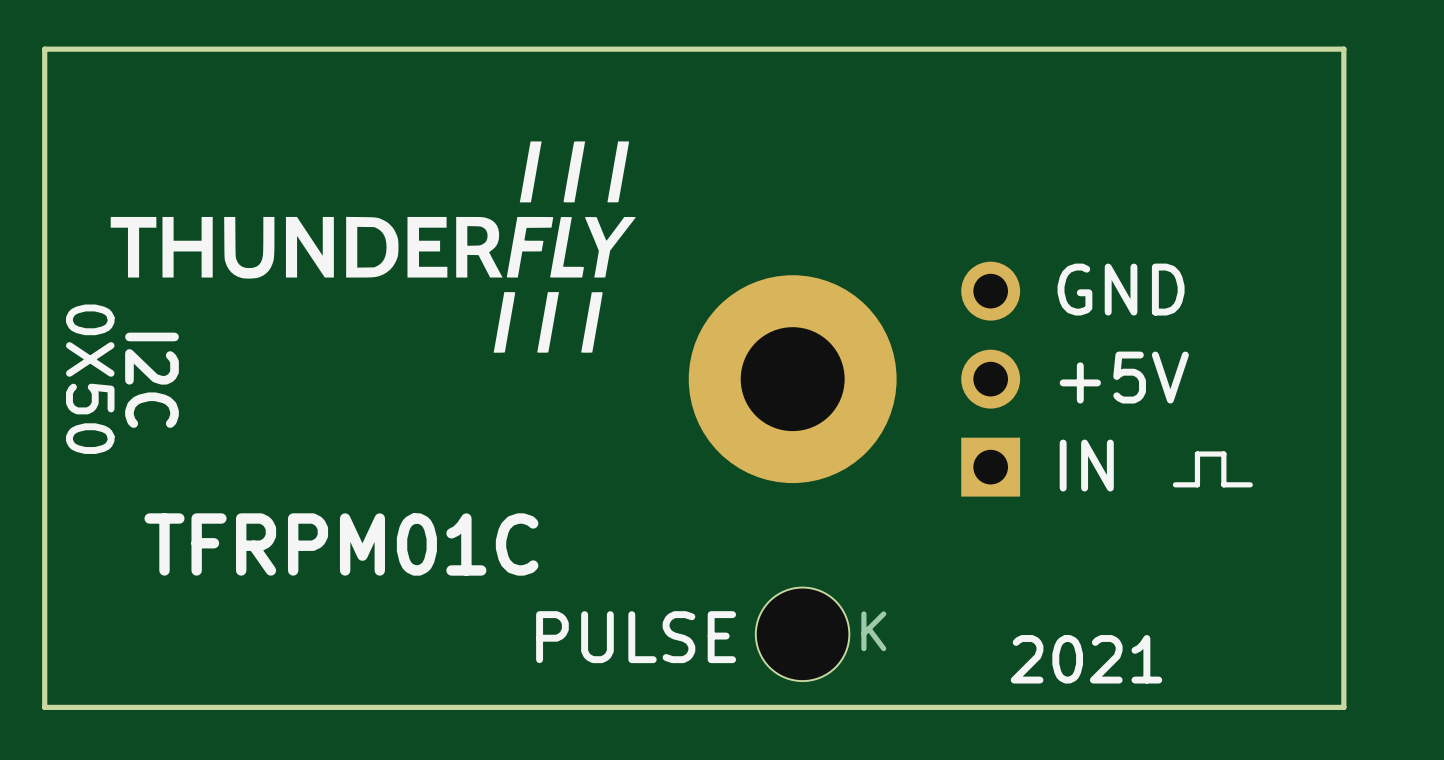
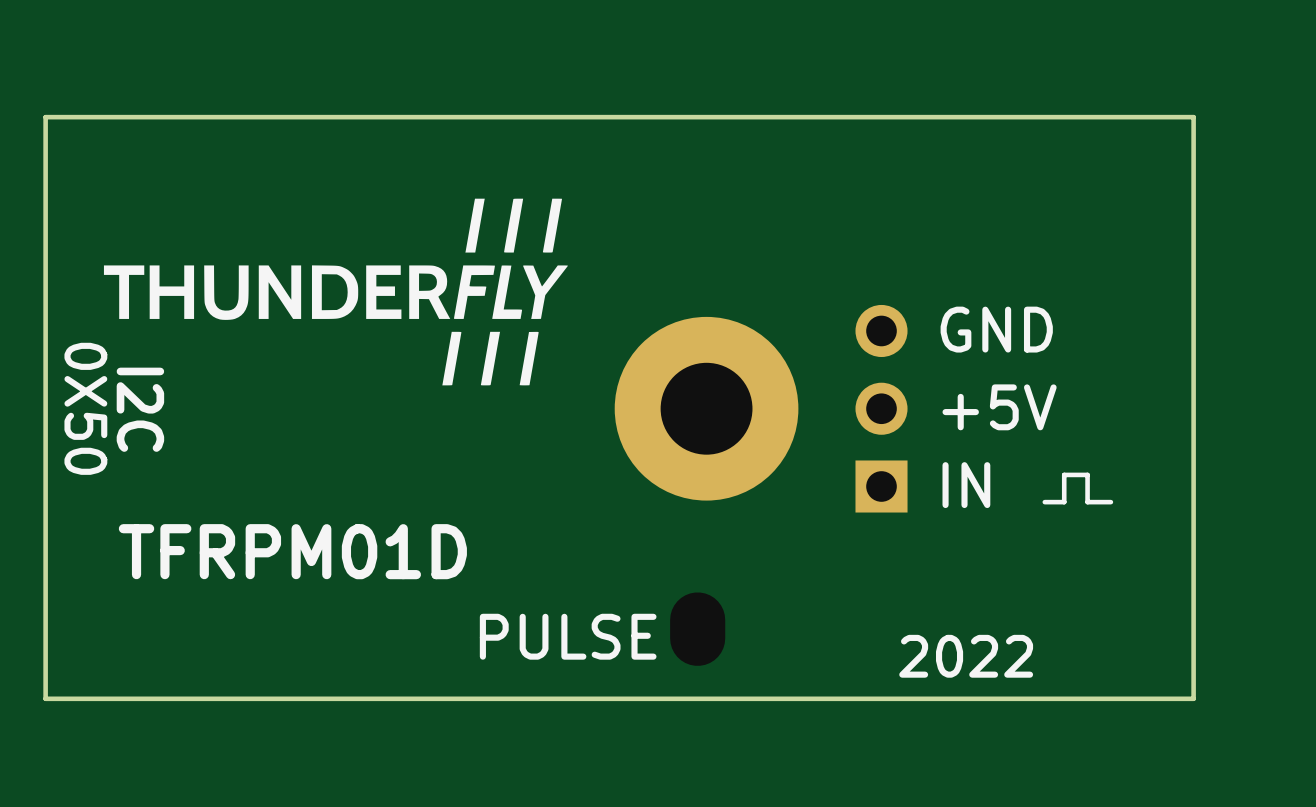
text: TFRPM01C (341, 544) -> TFRPM01D (292, 551)
part footprint: [755, 587, 850, 682] -> [670, 592, 726, 666]
text: 2021 (1086, 659) -> 2022 (966, 656)

